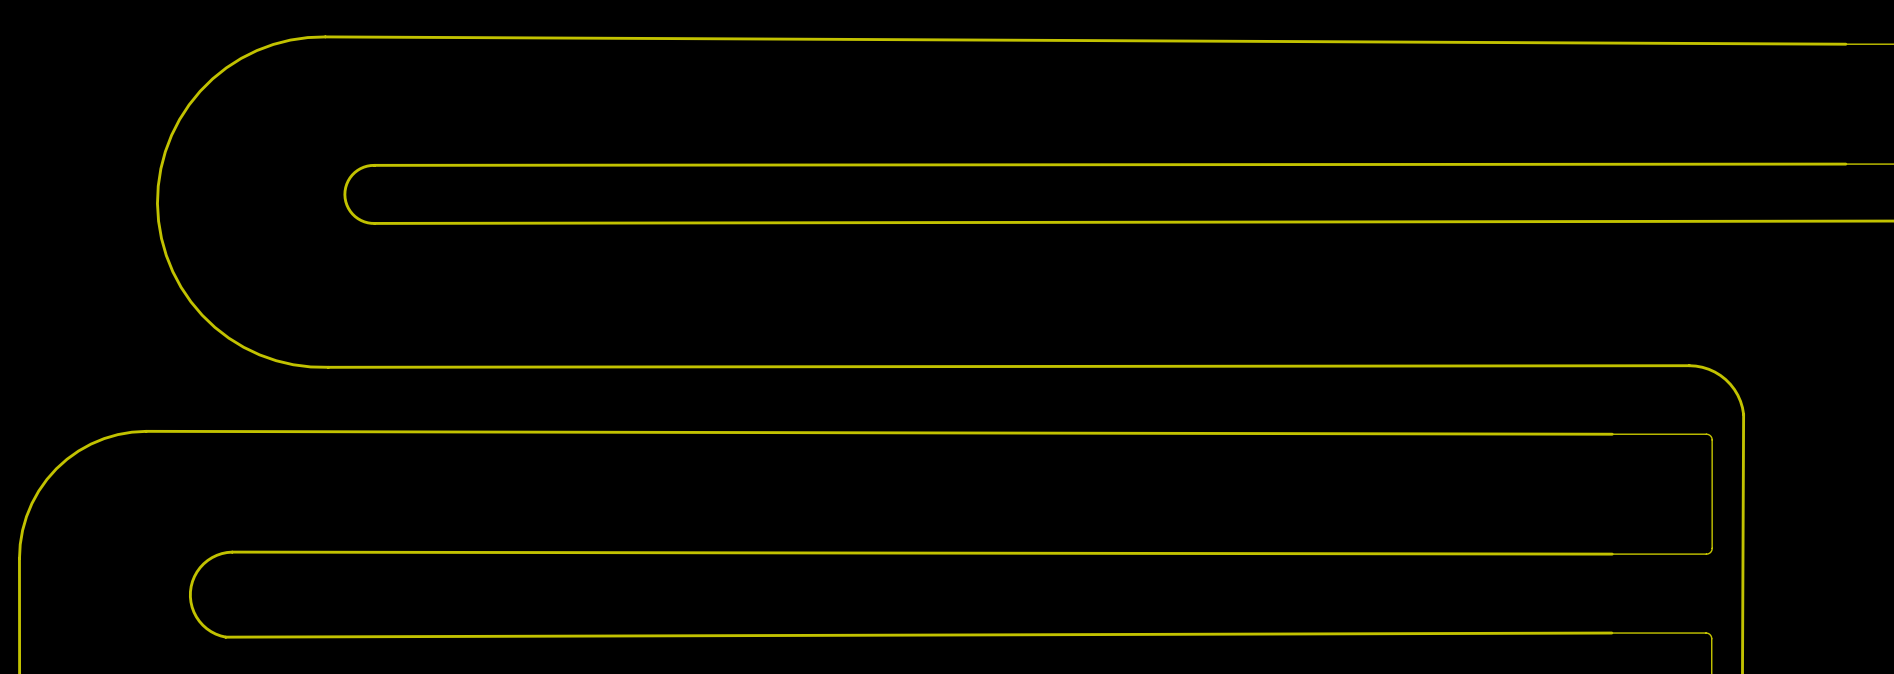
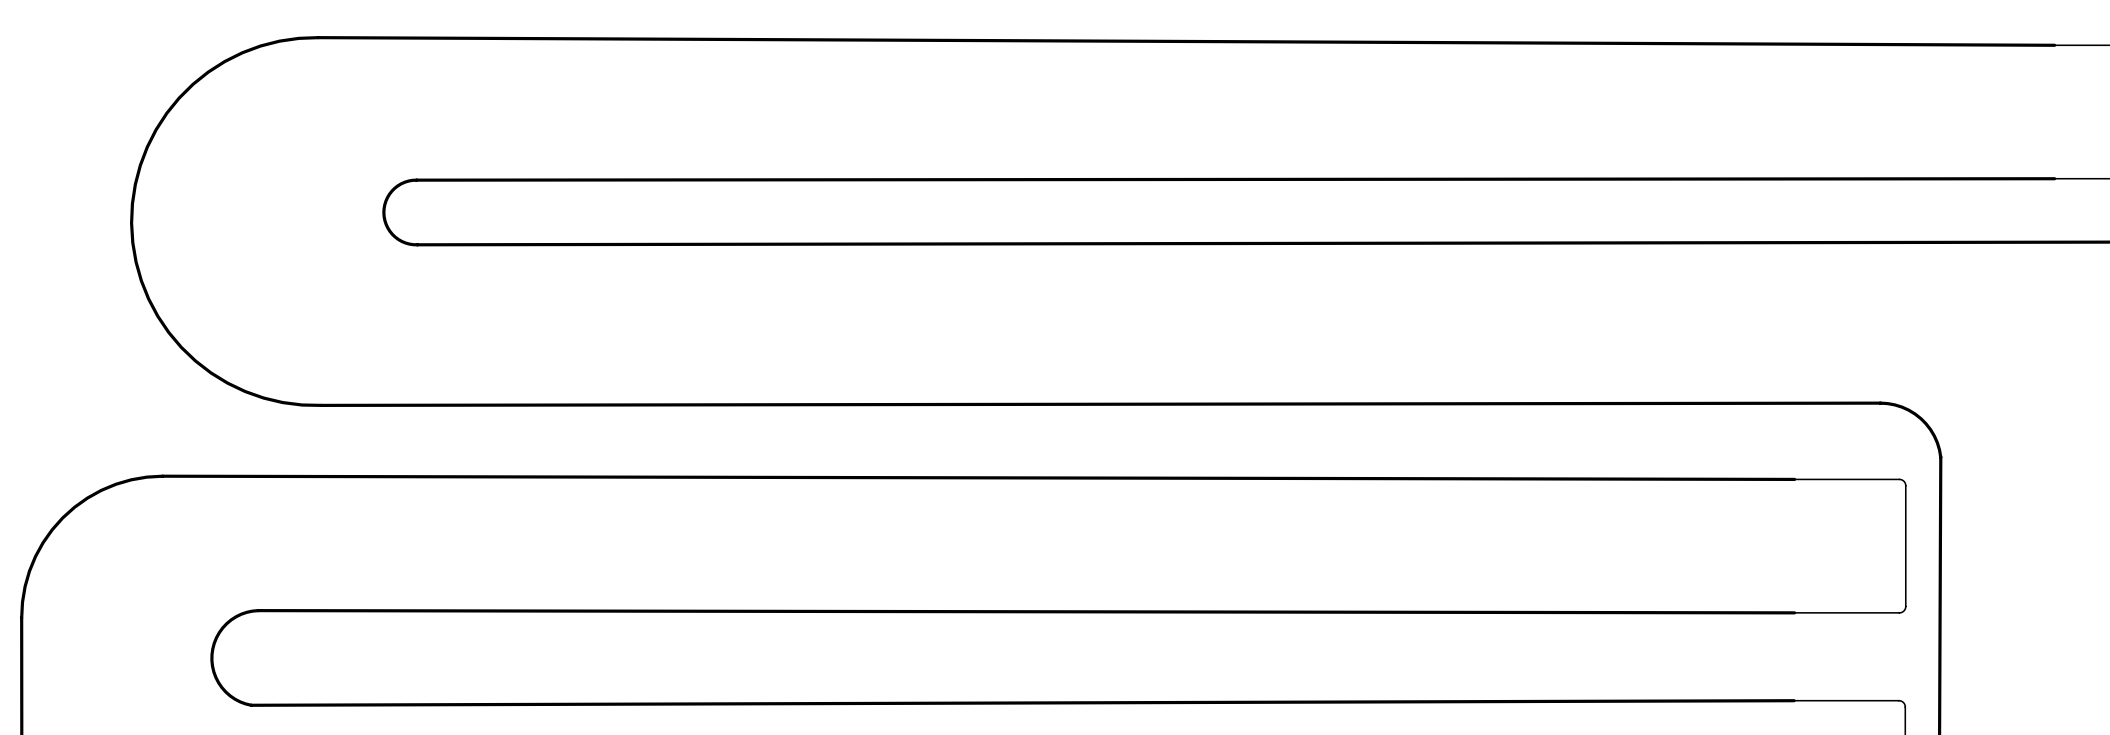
board edge: (1845, 44) (307, 37) (273, 44) (241, 58) (212, 78) (200, 91) (179, 119) (171, 135) (160, 168) (158, 186) (158, 221) (166, 255) (181, 287) (202, 315) (214, 327) (243, 347) (276, 360) (310, 366) (1689, 365) -> (2054, 45) (298, 38) (260, 46) (242, 52) (208, 72) (179, 98) (166, 113) (147, 147) (135, 184) (132, 203) (132, 242) (141, 280) (157, 316) (181, 347) (195, 360) (227, 383) (263, 398) (302, 405) (1880, 403)

